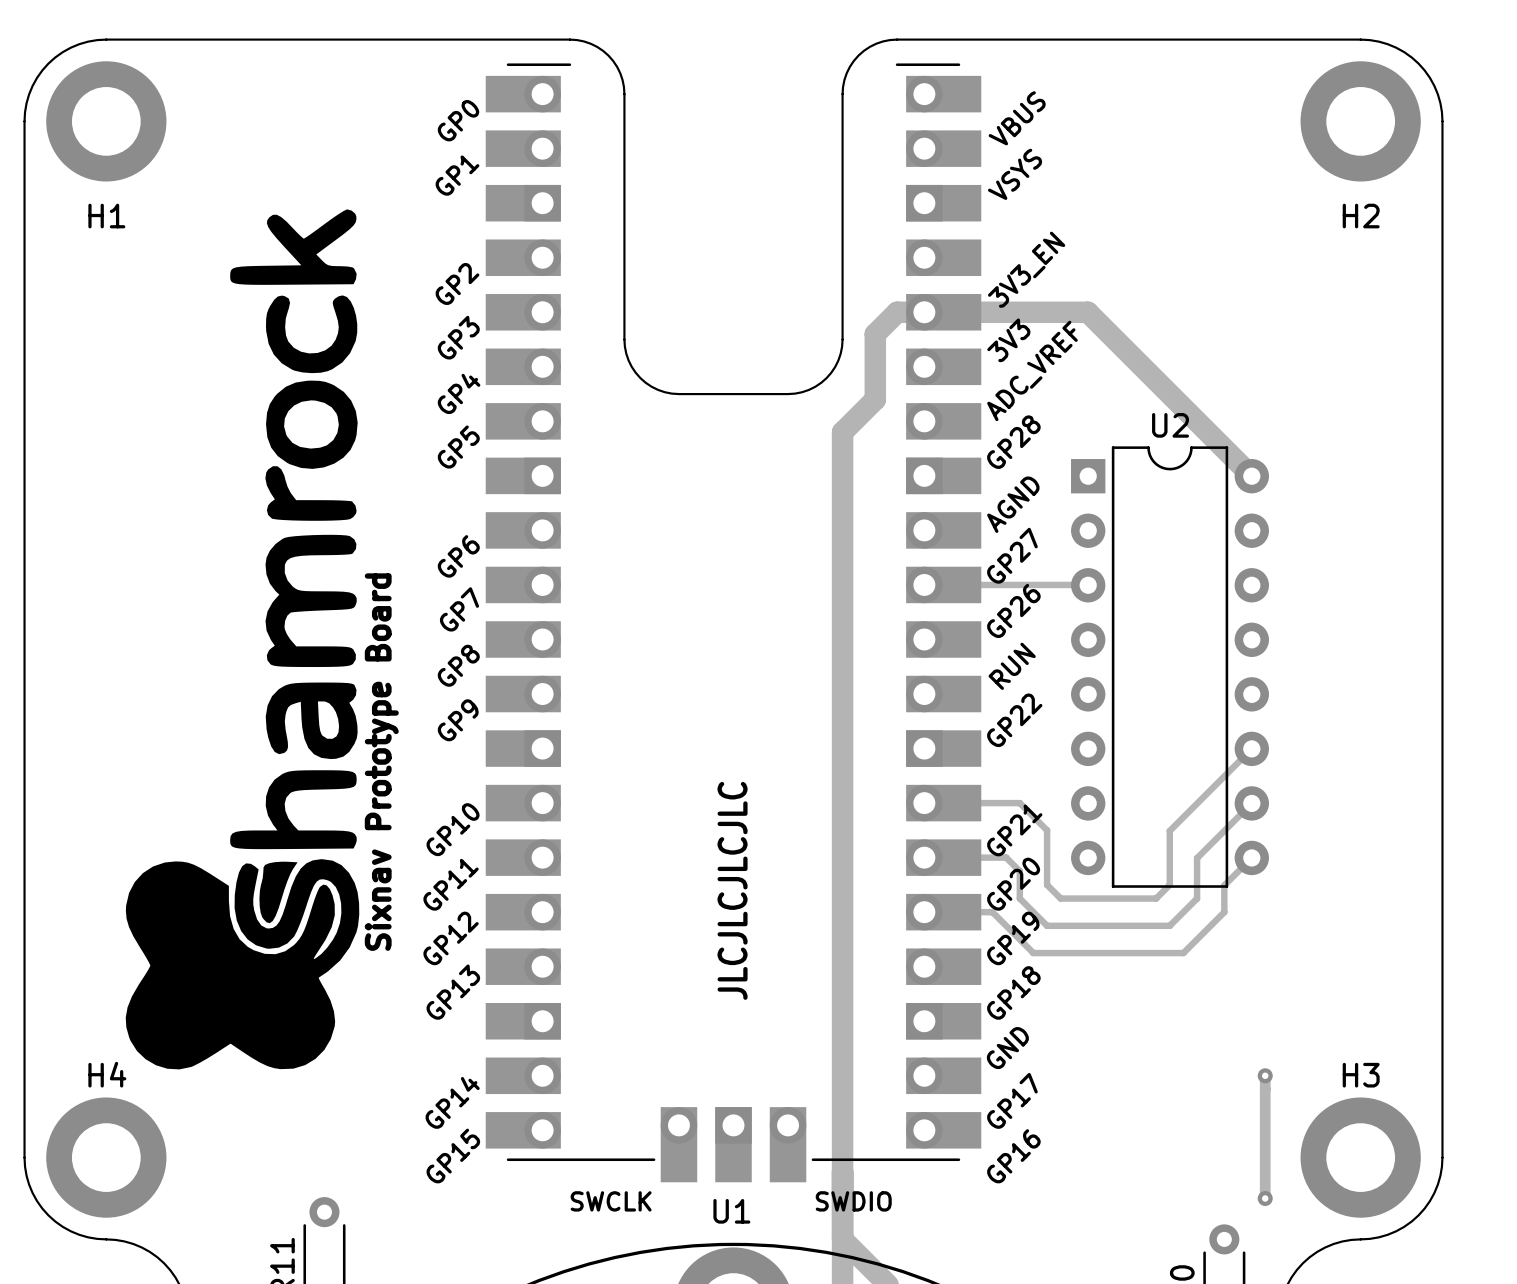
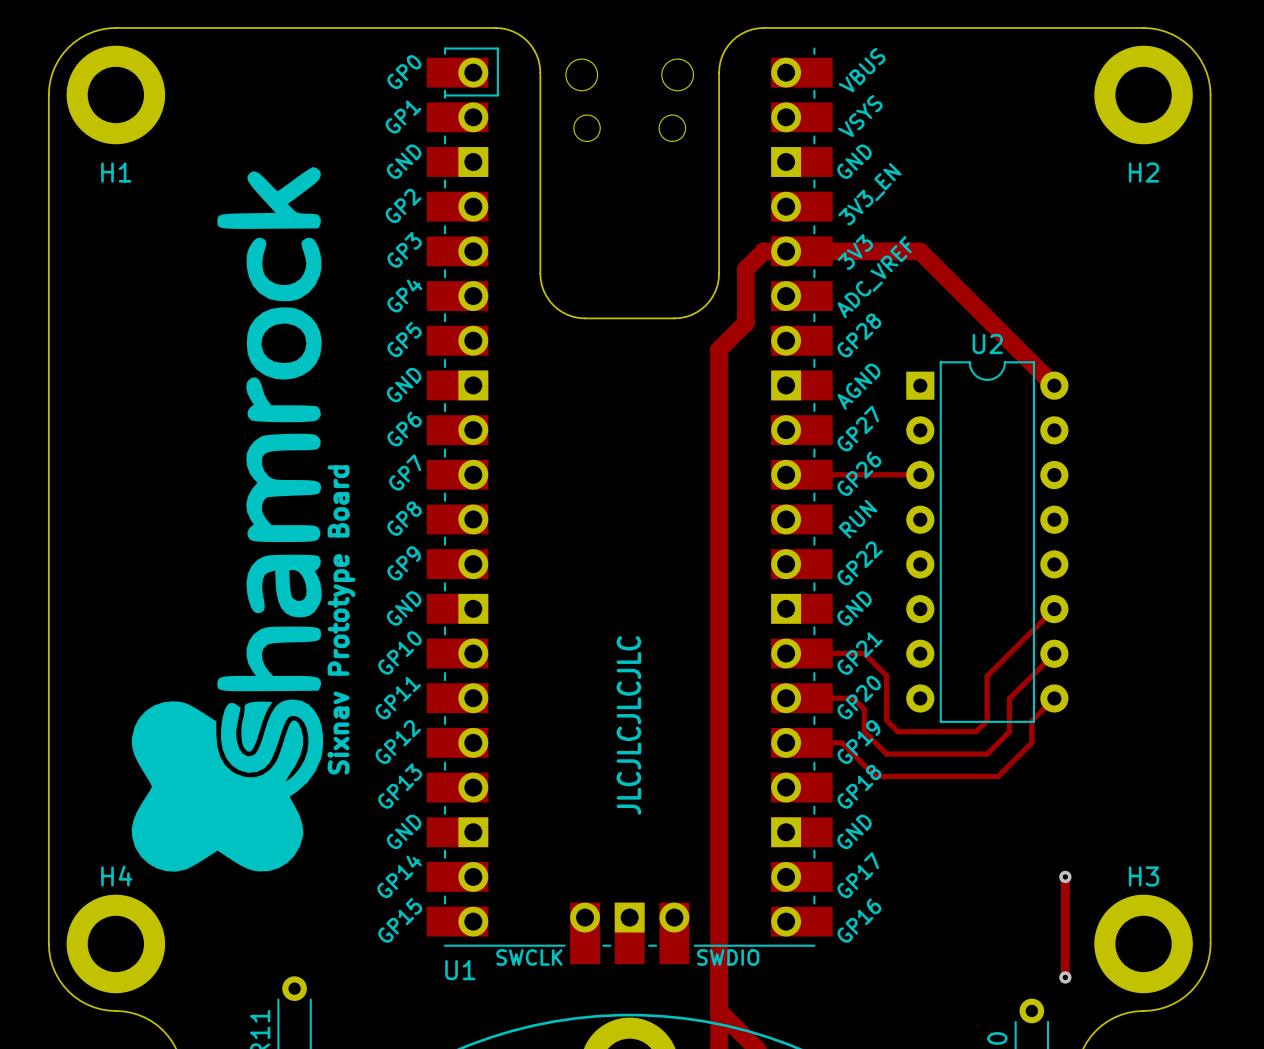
U1 footprint: [485, 63, 982, 1183] -> [426, 47, 833, 965]
U1 name position: U1 (731, 1211) -> U1 (460, 970)

